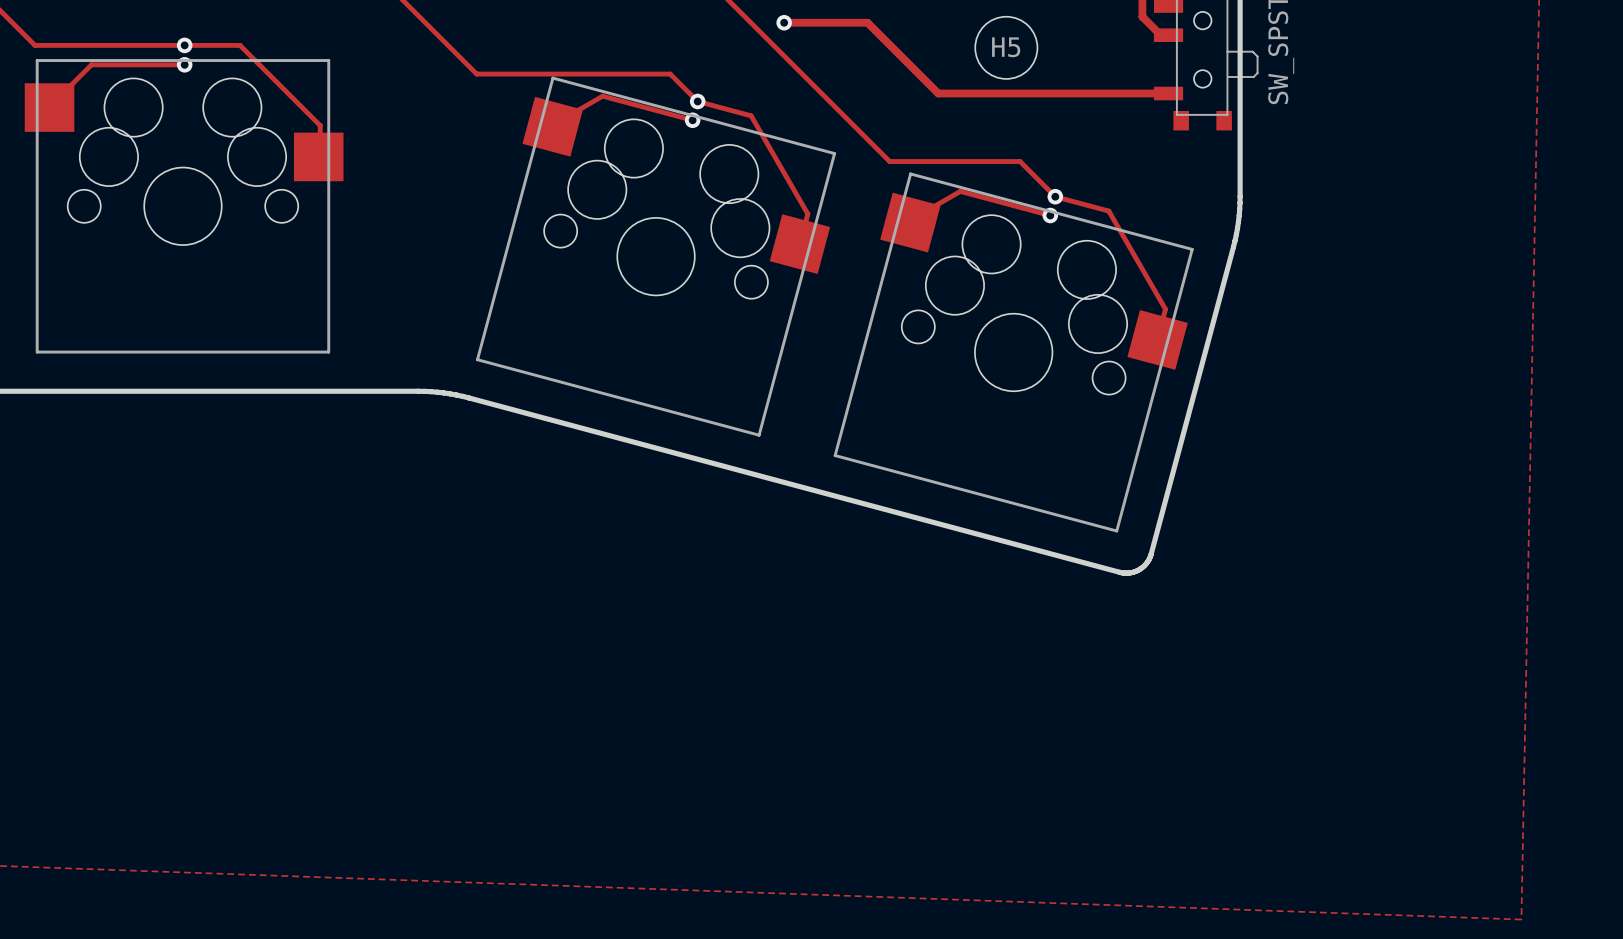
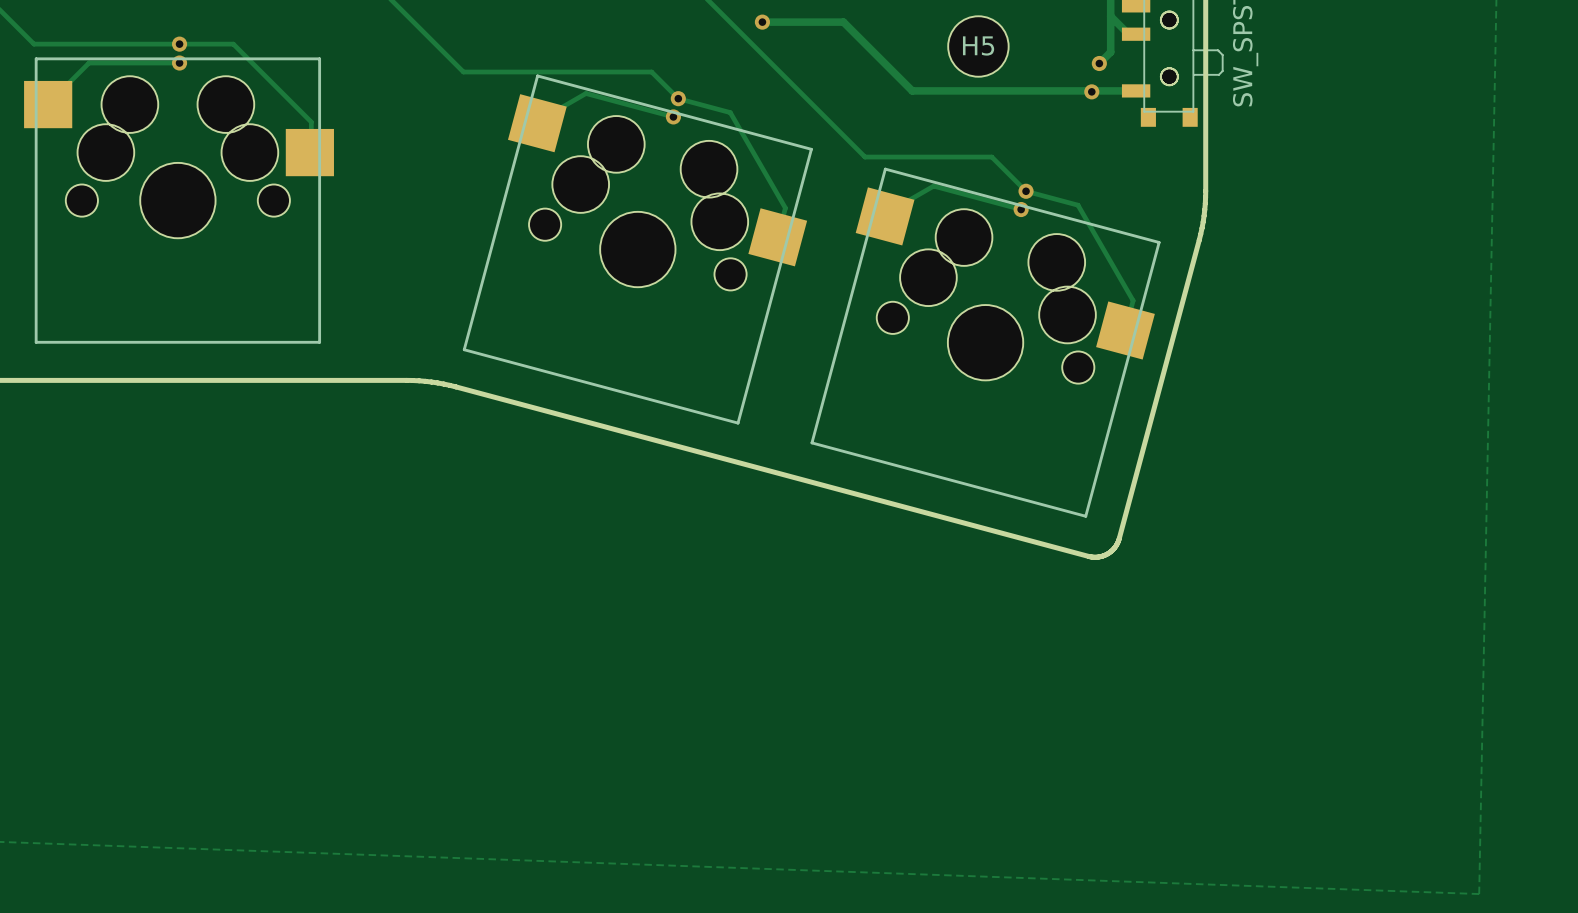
track: none -> (1110, 16) (1110, 52) (1099, 63)
part: none -> (1169, 48)
via: none -> (1099, 63)
via: none -> (1091, 91)

